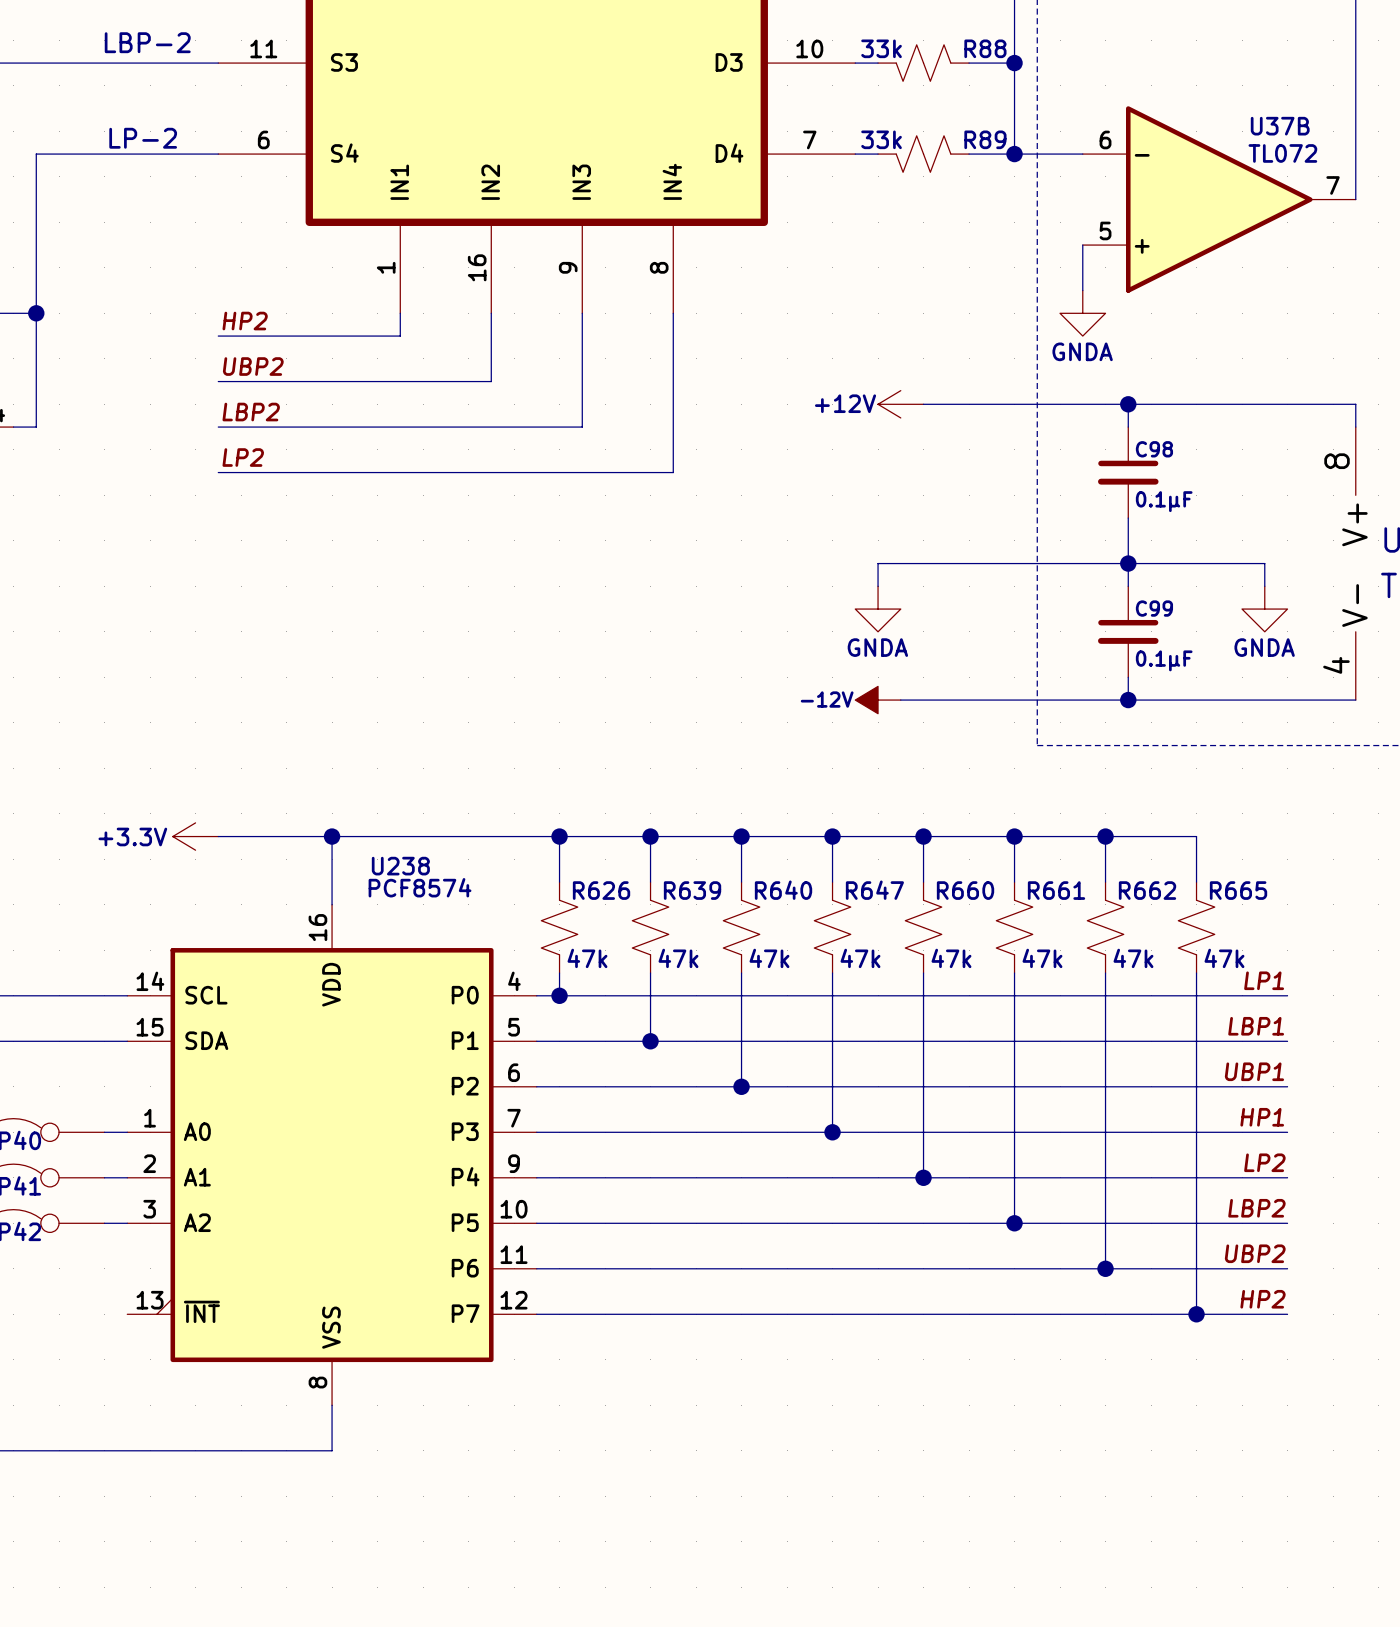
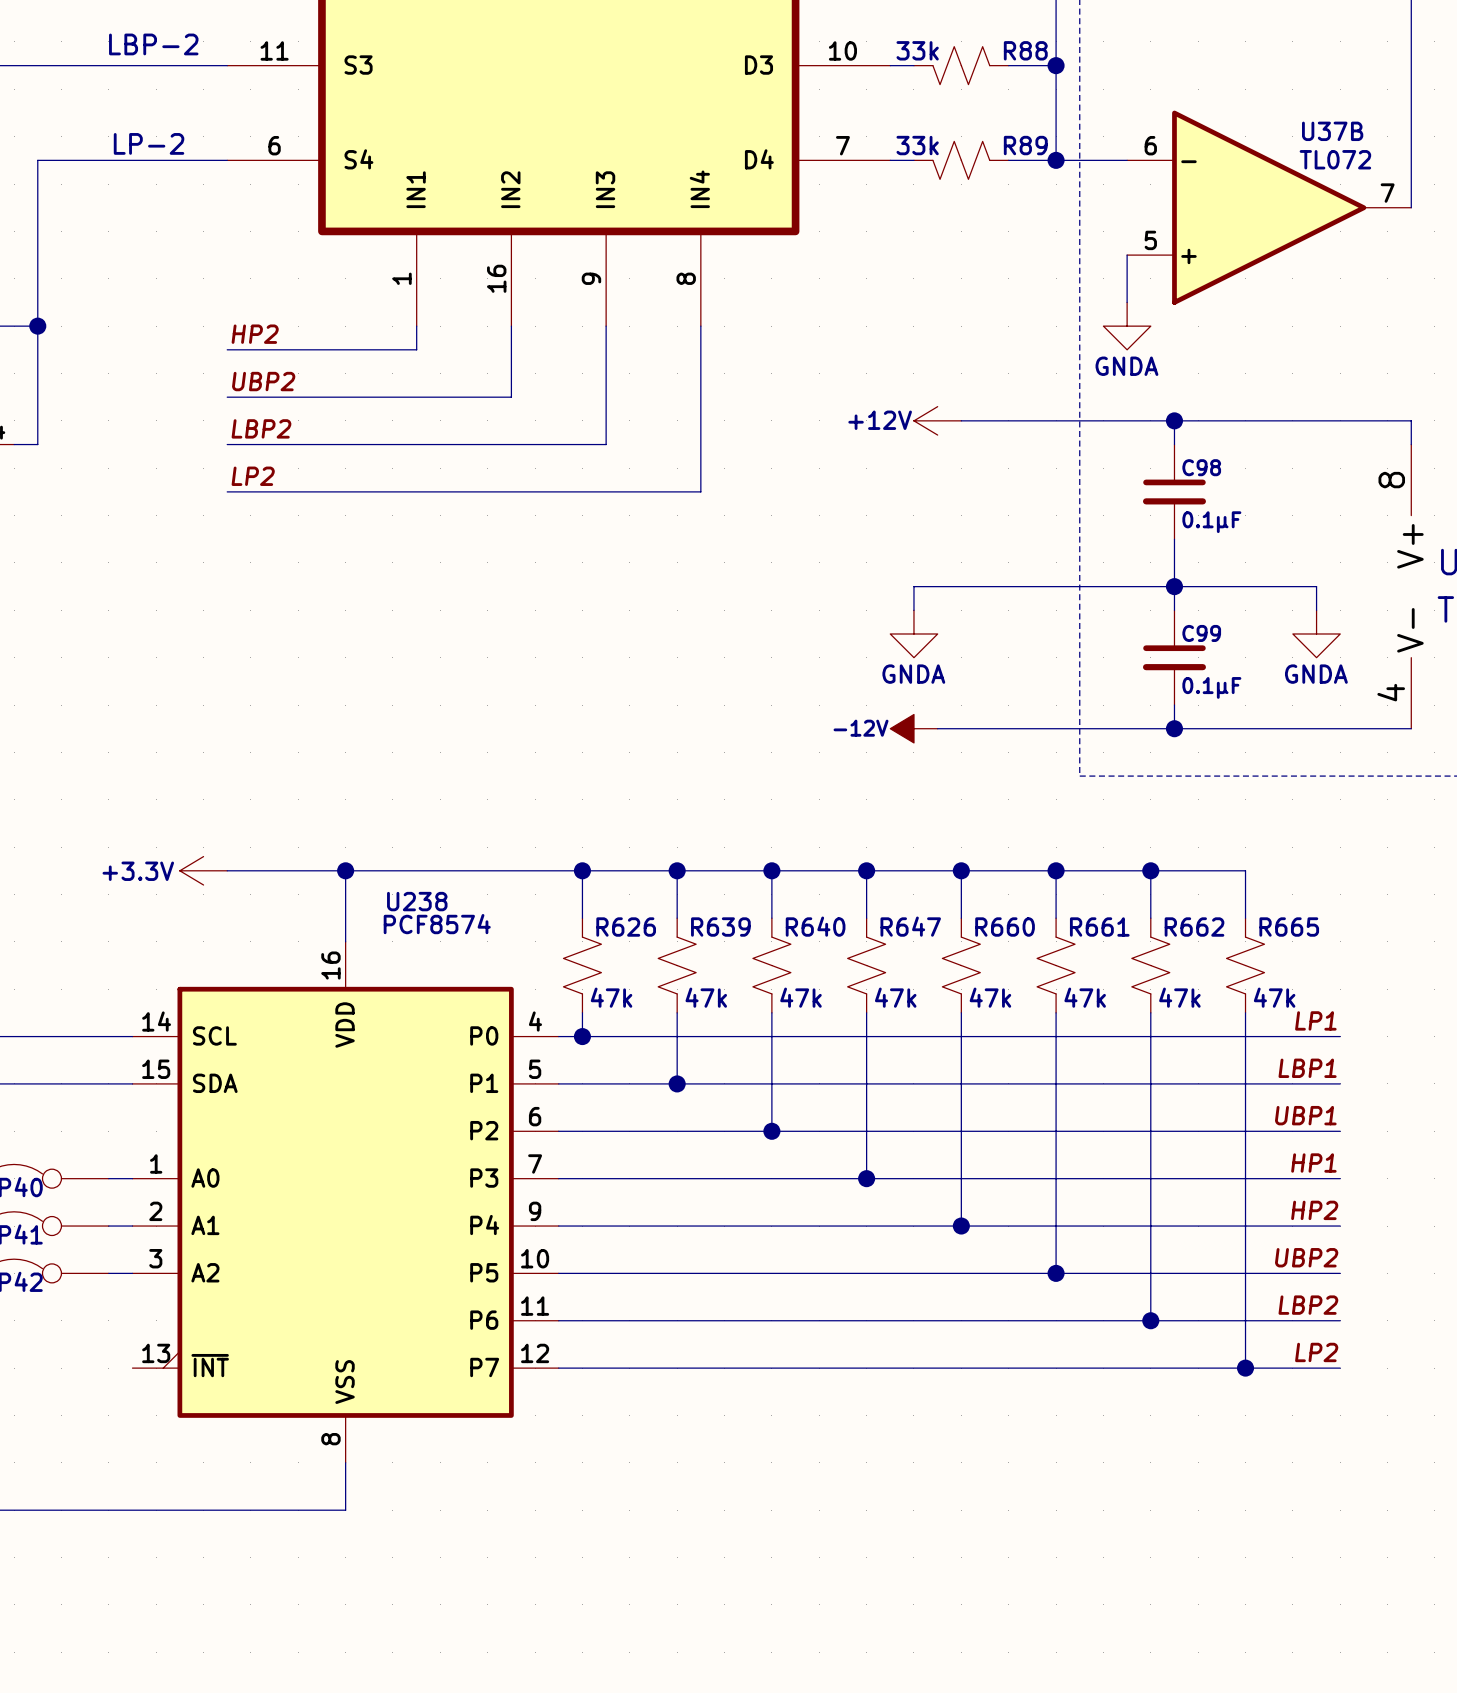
label: LP2 (1264, 1162) -> HP2 (1314, 1210)
label: LBP2 (1256, 1208) -> UBP2 (1306, 1257)
label: UBP2 (1255, 1253) -> LBP2 (1308, 1305)
label: HP2 (1263, 1299) -> LP2 (1316, 1352)

